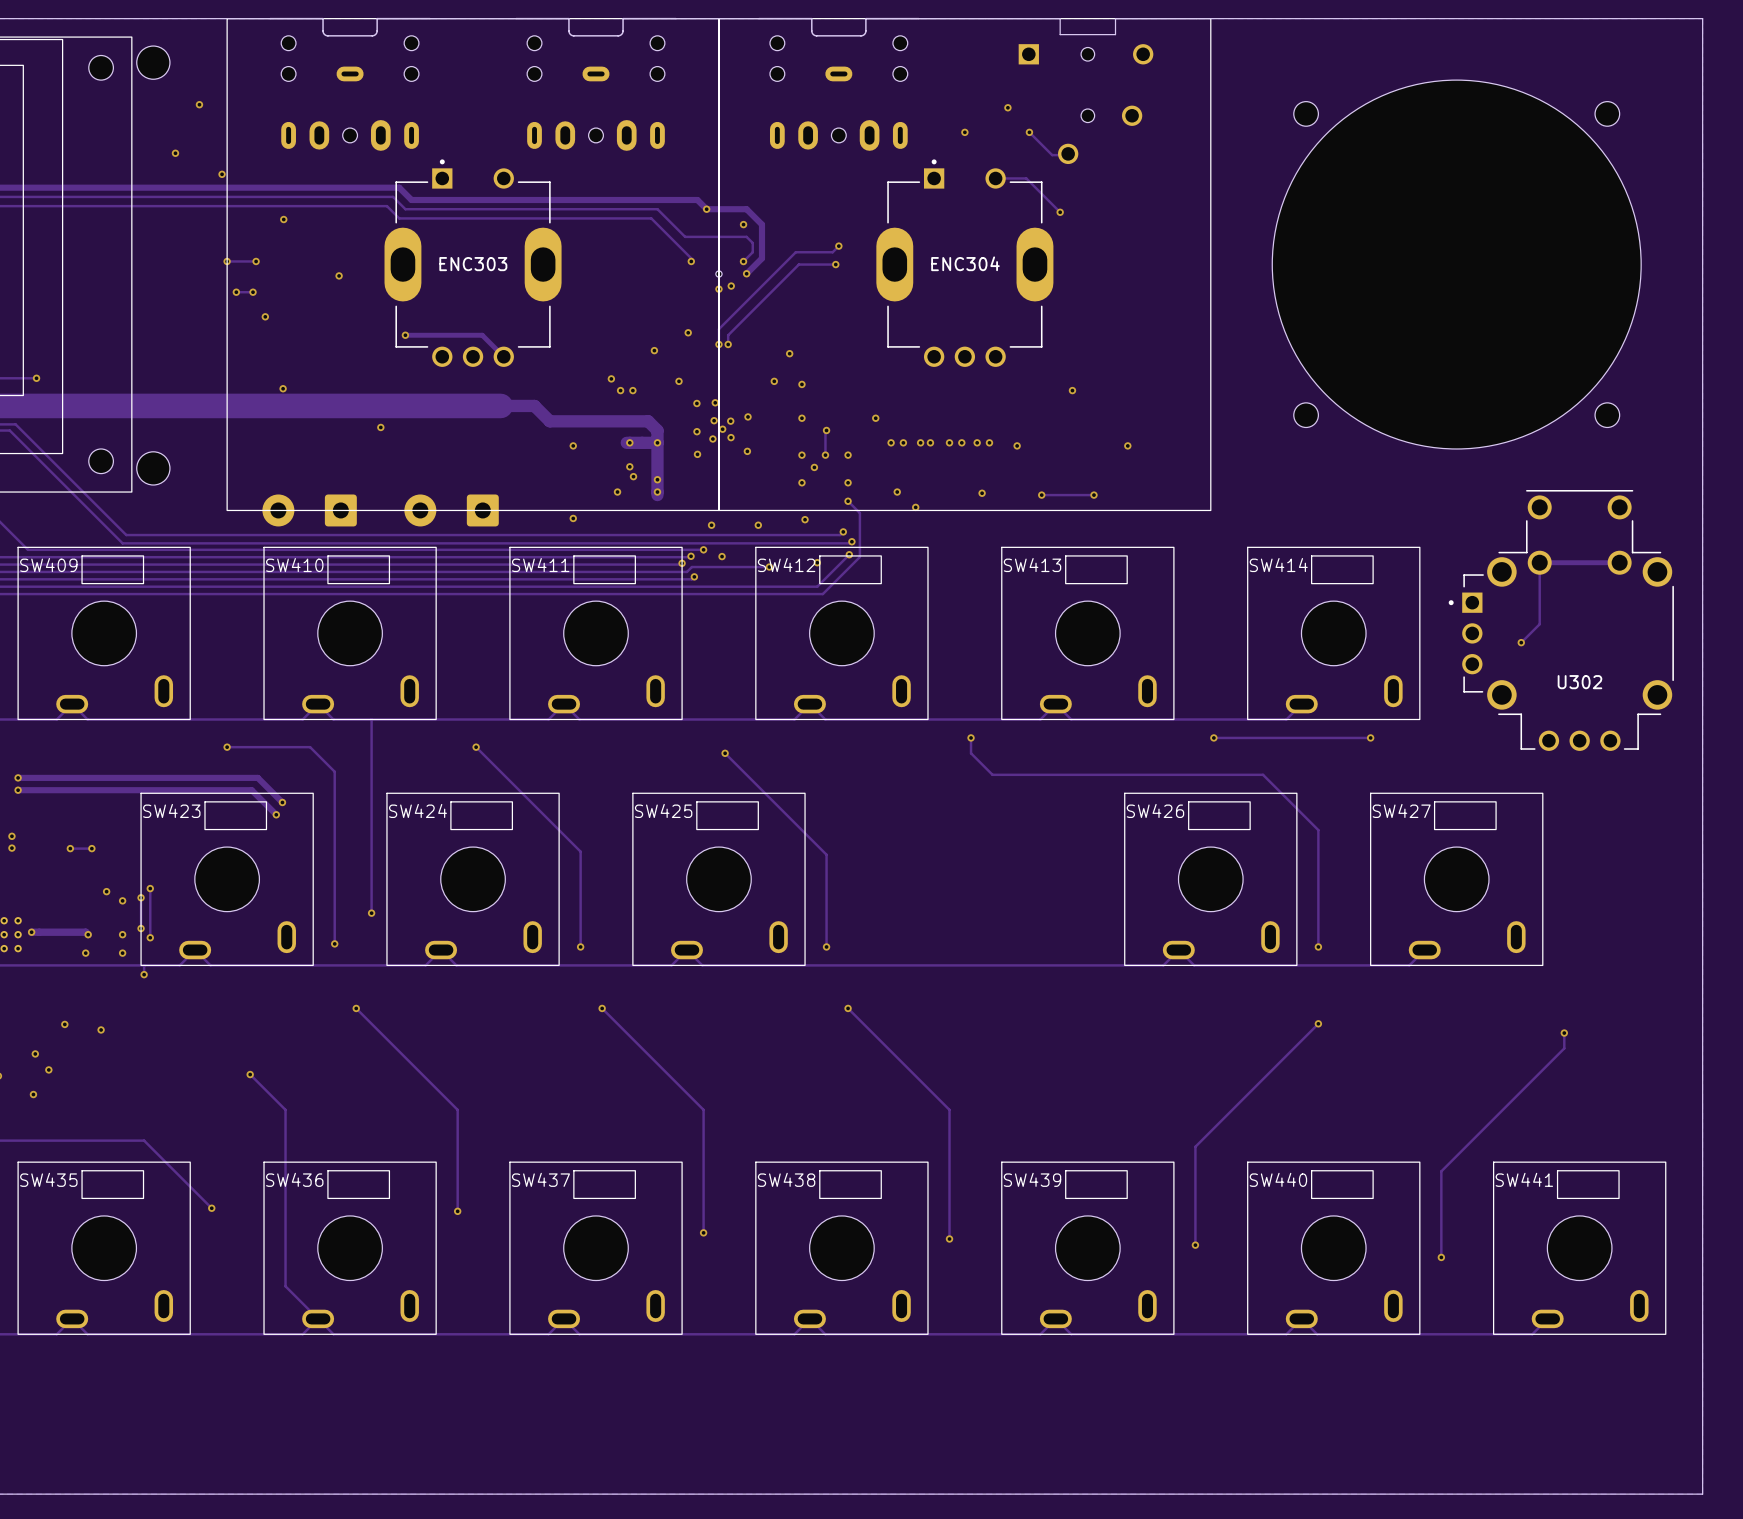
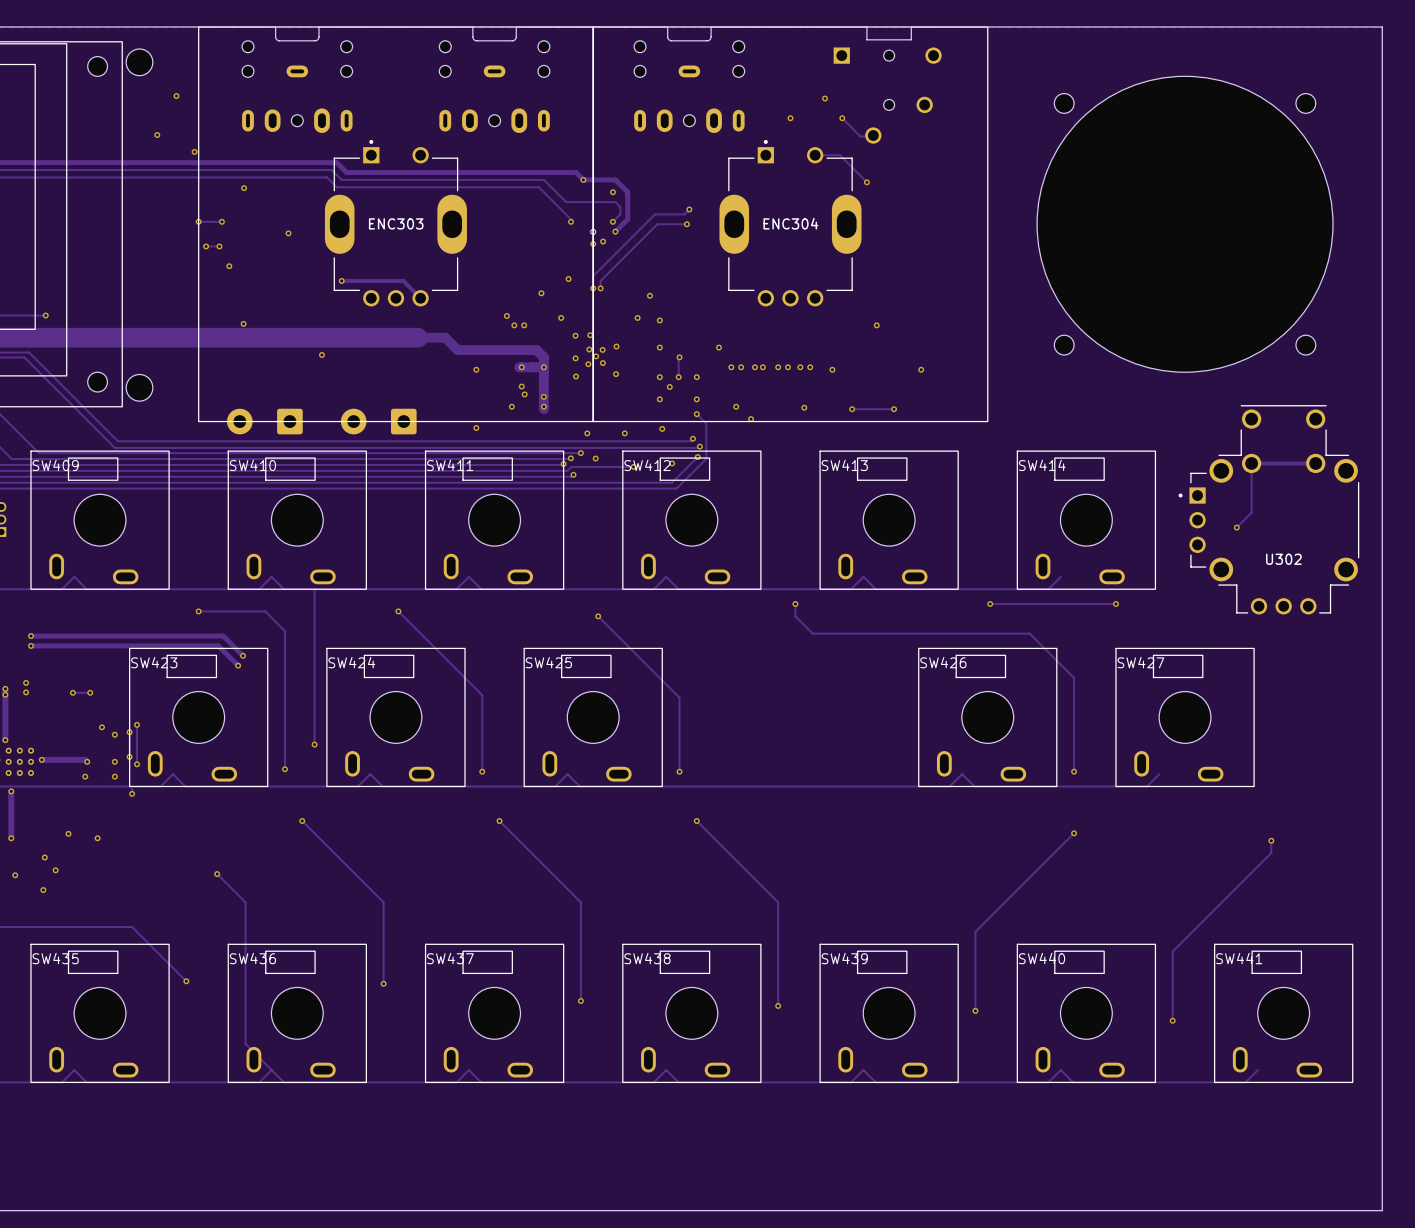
SW409 footprint: [17, 546, 191, 721] -> [30, 450, 170, 590]
SW410 footprint: [263, 546, 437, 721] -> [227, 450, 367, 590]
SW411 footprint: [509, 546, 683, 721] -> [425, 450, 565, 590]
SW412 footprint: [755, 546, 929, 721] -> [622, 450, 762, 590]
SW413 footprint: [1001, 546, 1175, 721] -> [819, 450, 959, 590]
SW414 footprint: [1247, 546, 1421, 721] -> [1016, 450, 1156, 590]
SW423 footprint: [140, 792, 314, 967] -> [129, 647, 269, 787]
SW424 footprint: [386, 792, 560, 967] -> [326, 647, 466, 787]
SW425 footprint: [632, 792, 806, 967] -> [523, 647, 663, 787]
SW426 footprint: [1124, 792, 1298, 967] -> [918, 647, 1058, 787]
SW427 footprint: [1370, 792, 1544, 967] -> [1115, 647, 1255, 787]
SW435 footprint: [17, 1161, 191, 1335] -> [30, 943, 170, 1083]
SW436 footprint: [263, 1161, 437, 1335] -> [227, 943, 367, 1083]
SW437 footprint: [509, 1161, 683, 1335] -> [425, 943, 565, 1083]
SW438 footprint: [755, 1161, 929, 1335] -> [622, 943, 762, 1083]
SW439 footprint: [1001, 1161, 1175, 1335] -> [819, 943, 959, 1083]
SW440 footprint: [1247, 1161, 1421, 1335] -> [1016, 943, 1156, 1083]
SW441 footprint: [1492, 1161, 1667, 1335] -> [1214, 943, 1354, 1083]

